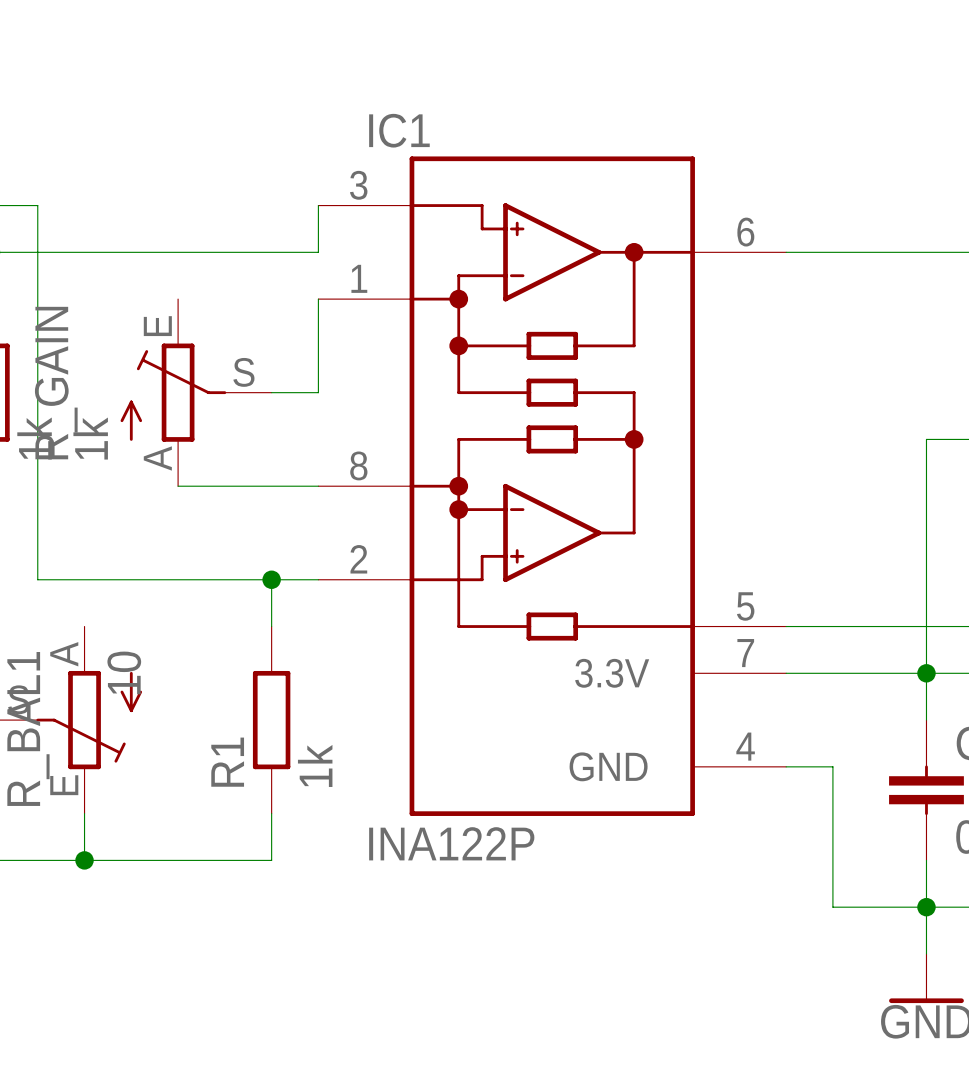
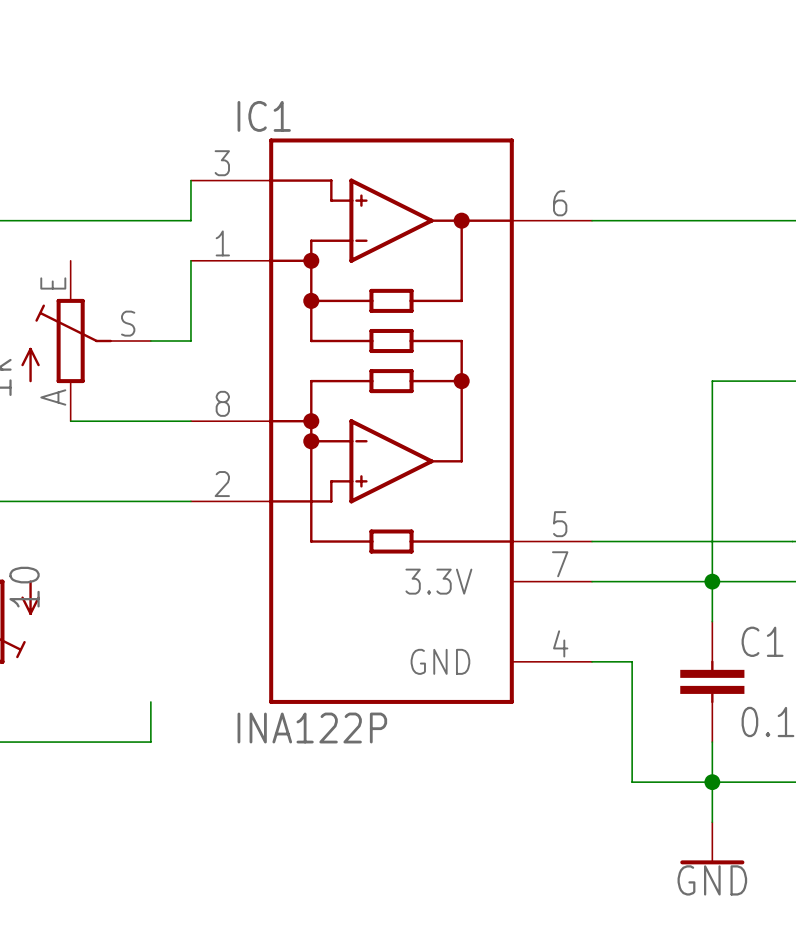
wire: (271, 579) (271, 626) -> none
junction: (271, 579) -> none
R1: 1k (271, 720) -> none

